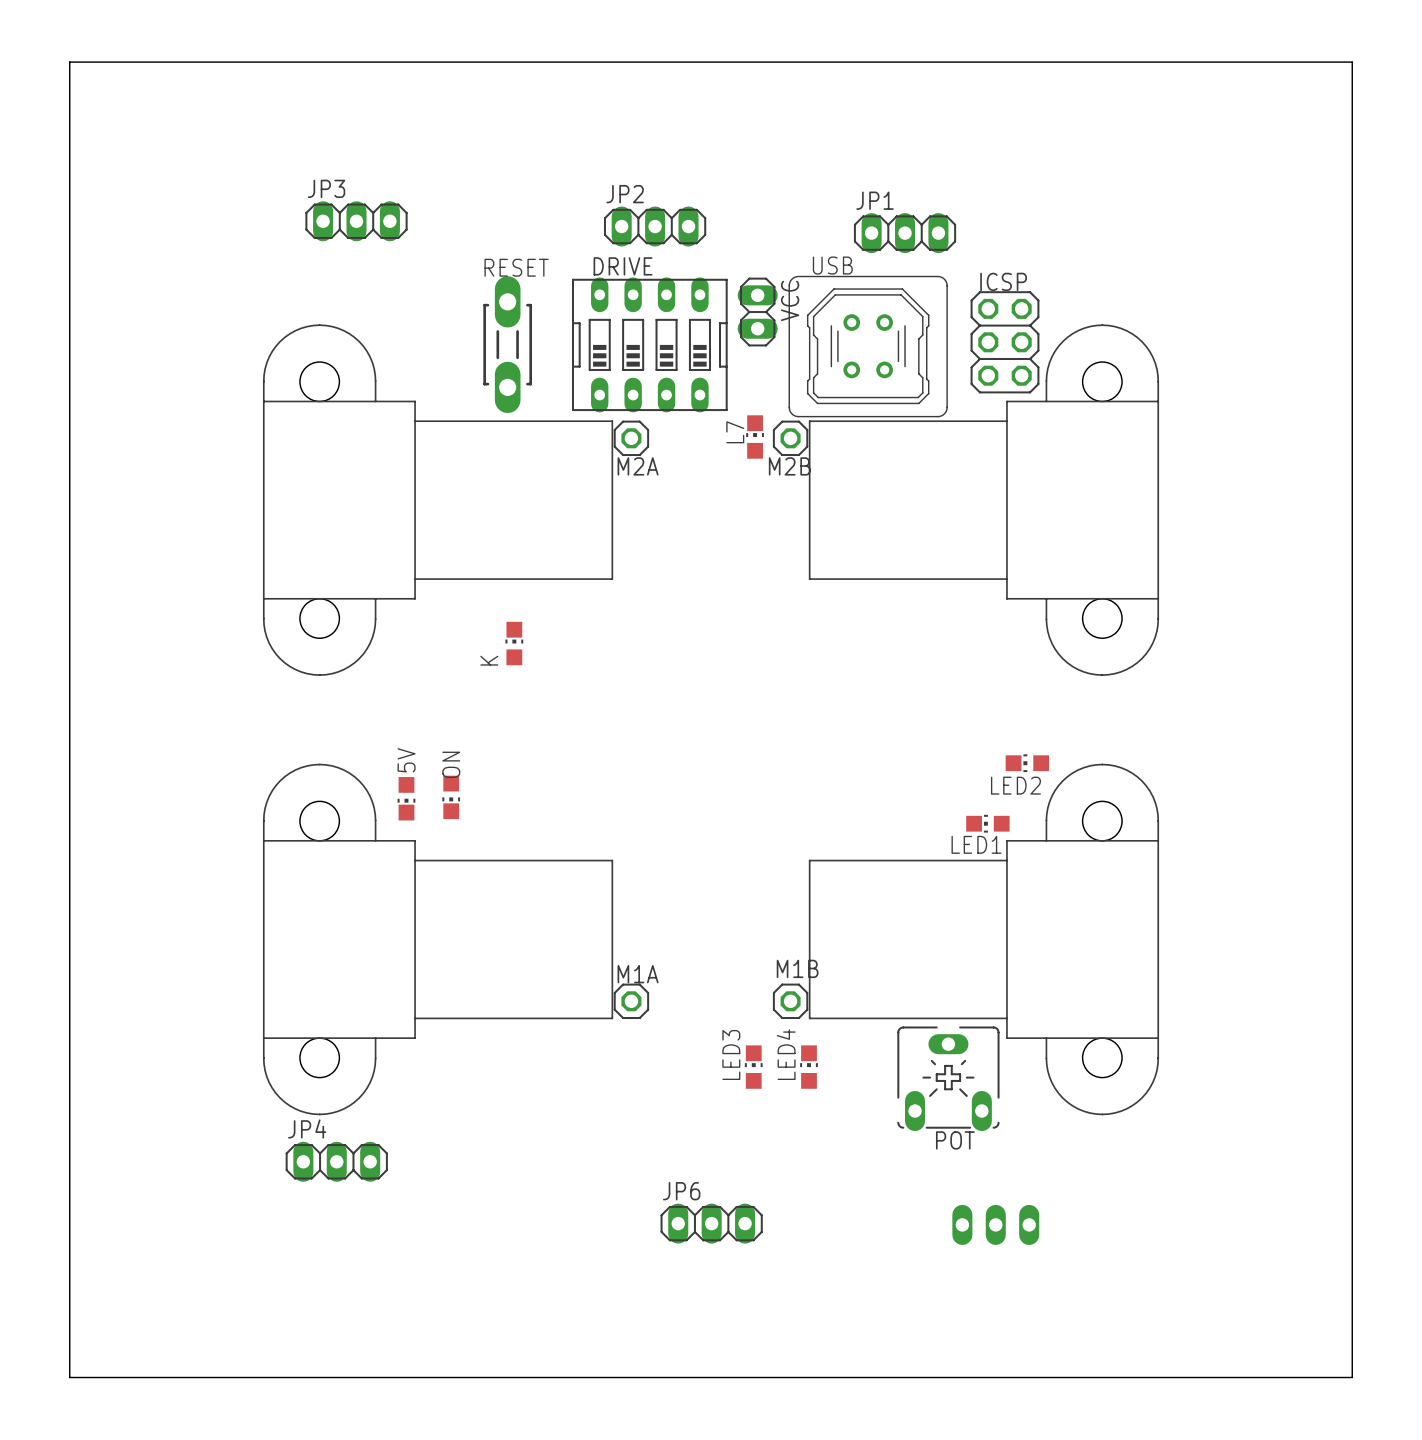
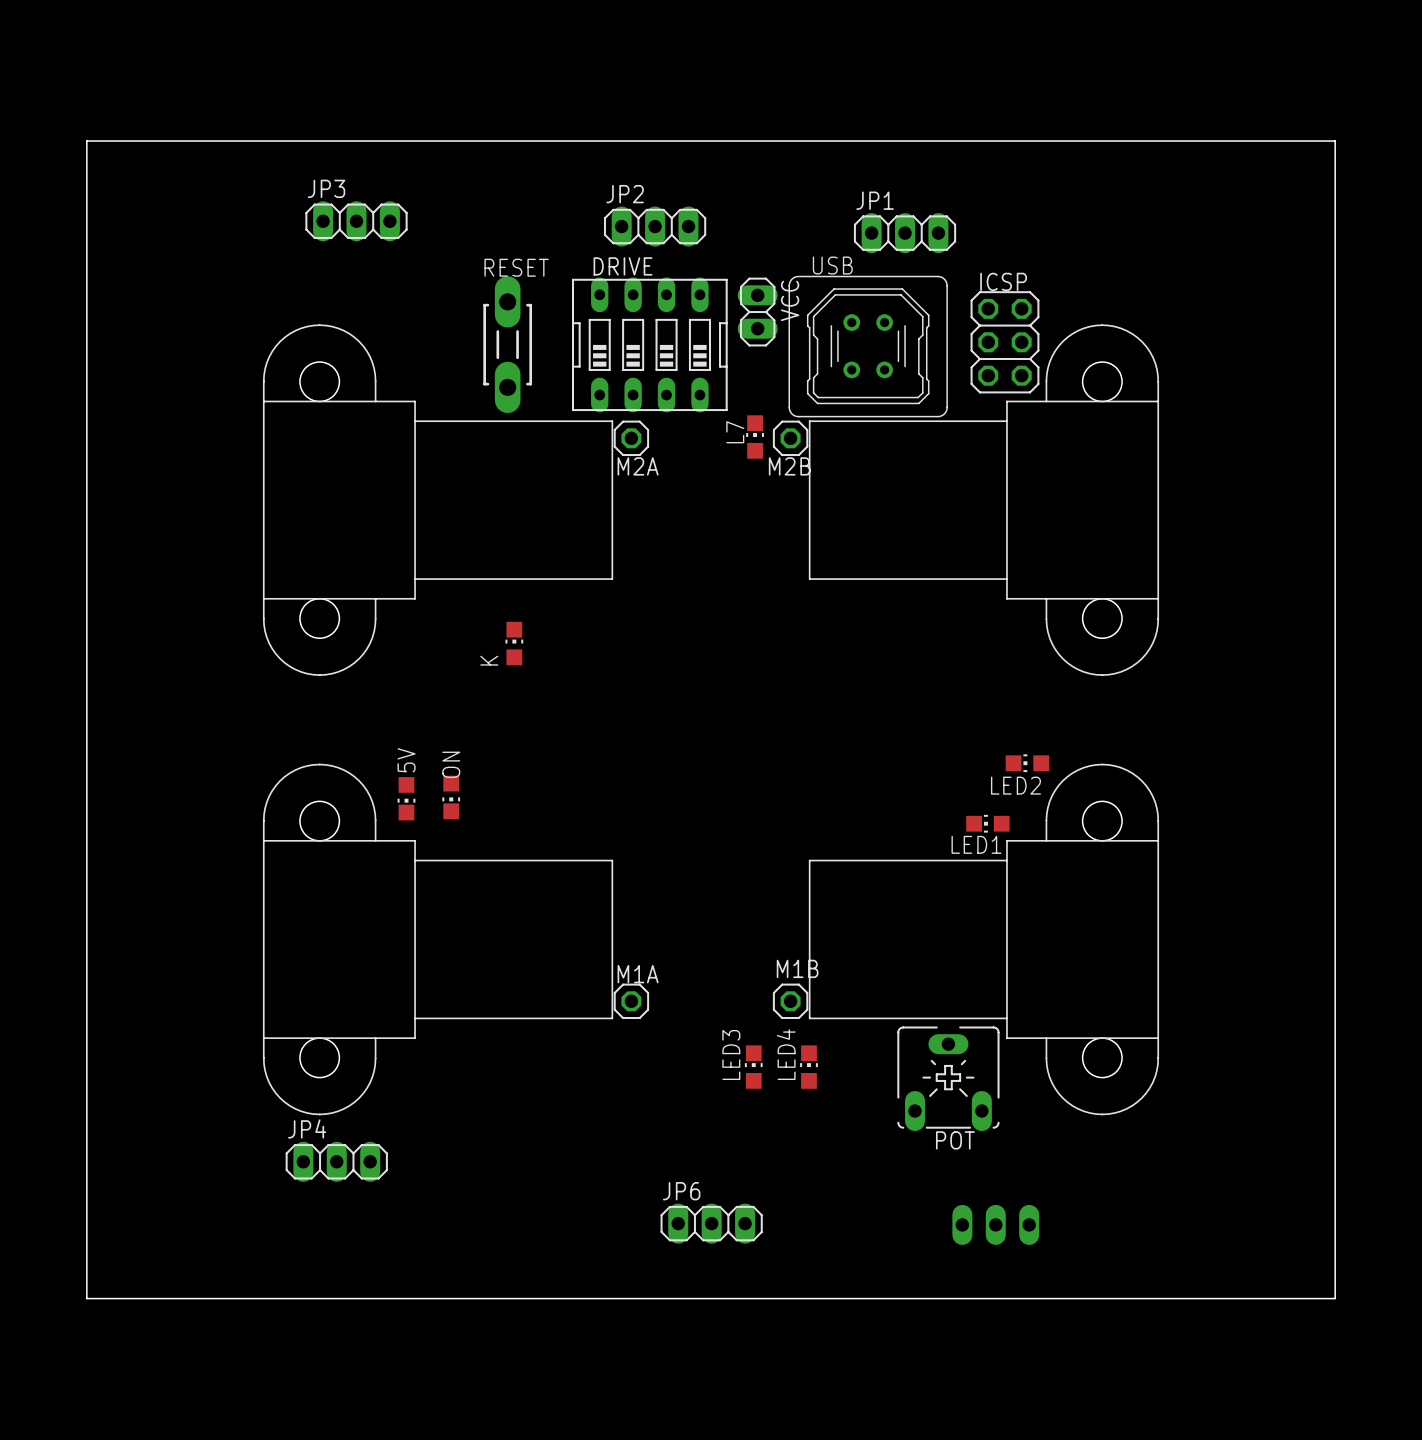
board edge: (69, 62) (69, 1377) (1352, 1377) (1352, 62) (69, 62) -> (86, 141) (86, 1298) (1335, 1298) (1335, 141) (86, 141)

